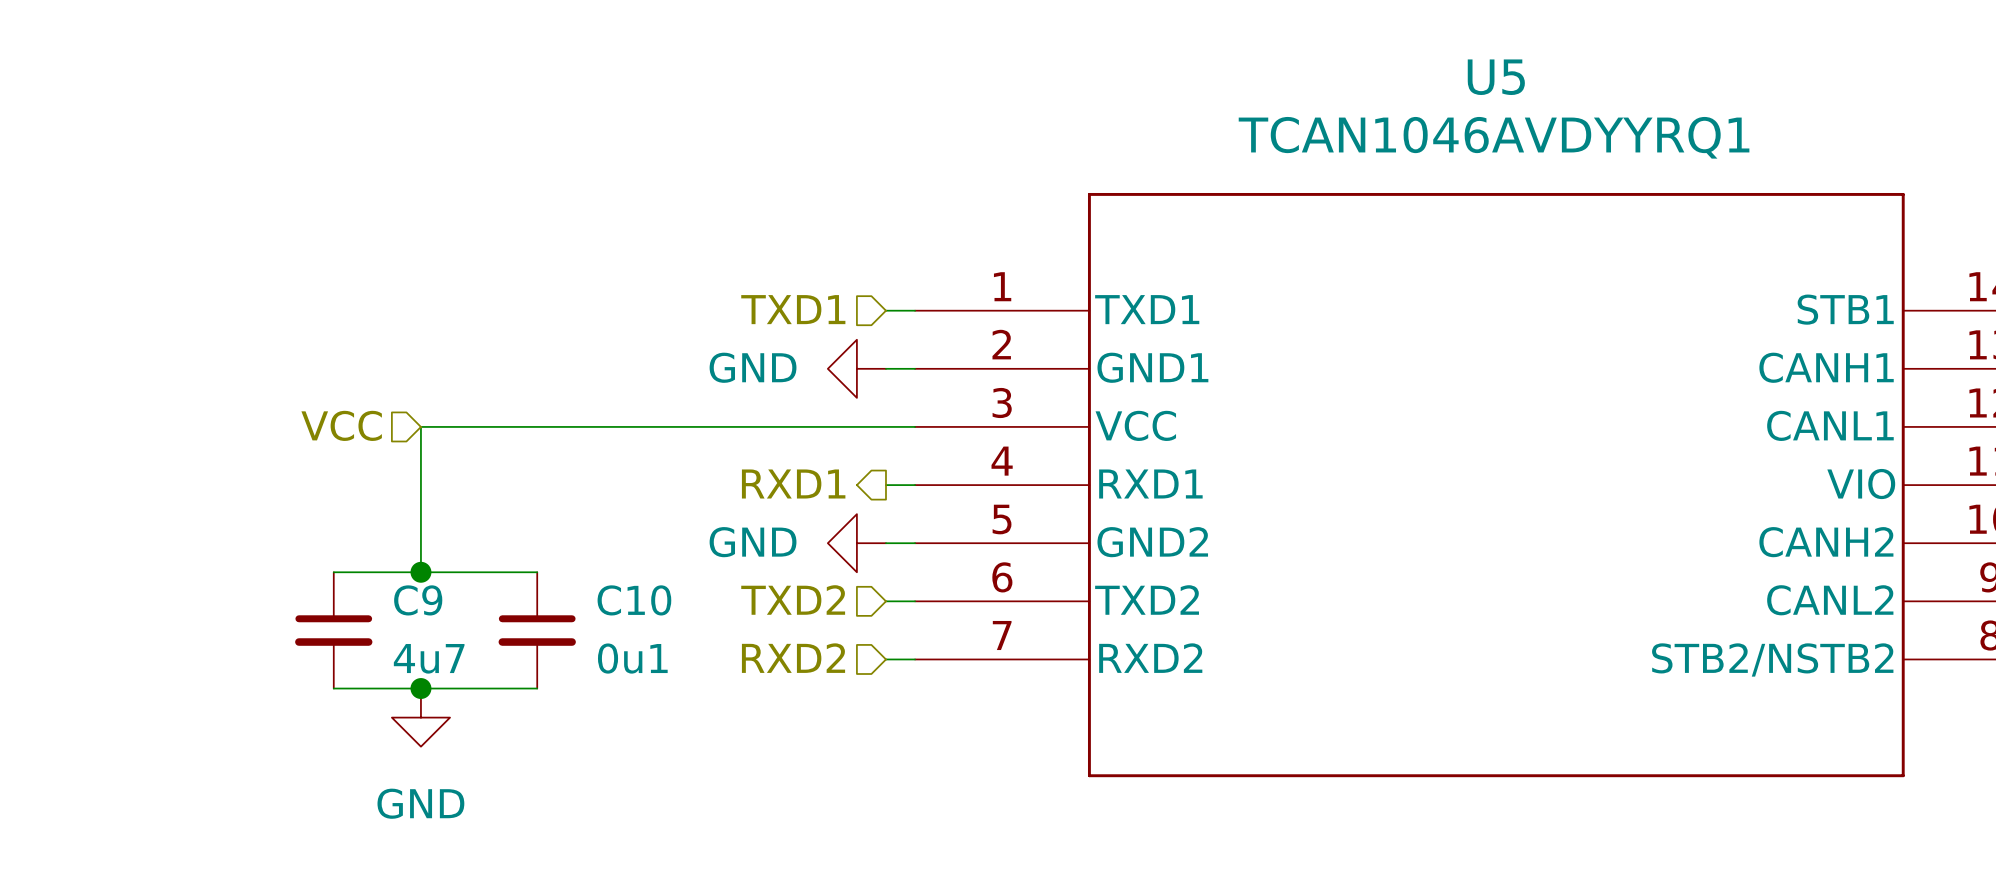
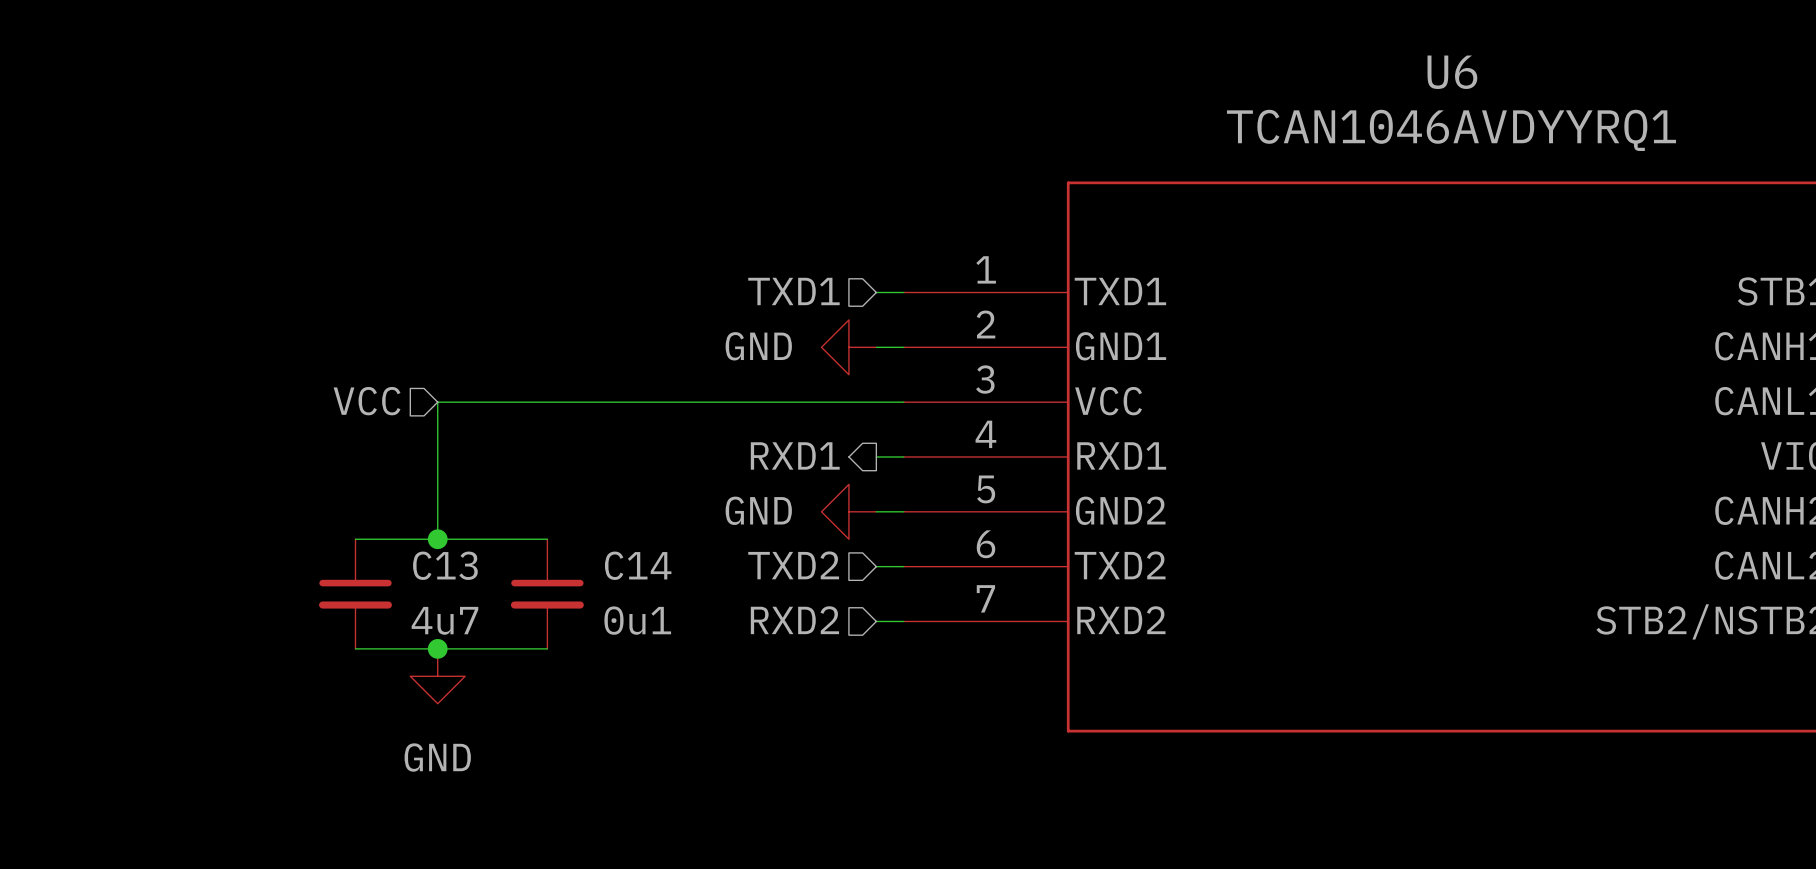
U5 name: U5 (1496, 77) -> U6 (1452, 72)
C9 name: C9 (418, 600) -> C13 (445, 565)
C10 name: C10 (634, 600) -> C14 (638, 565)

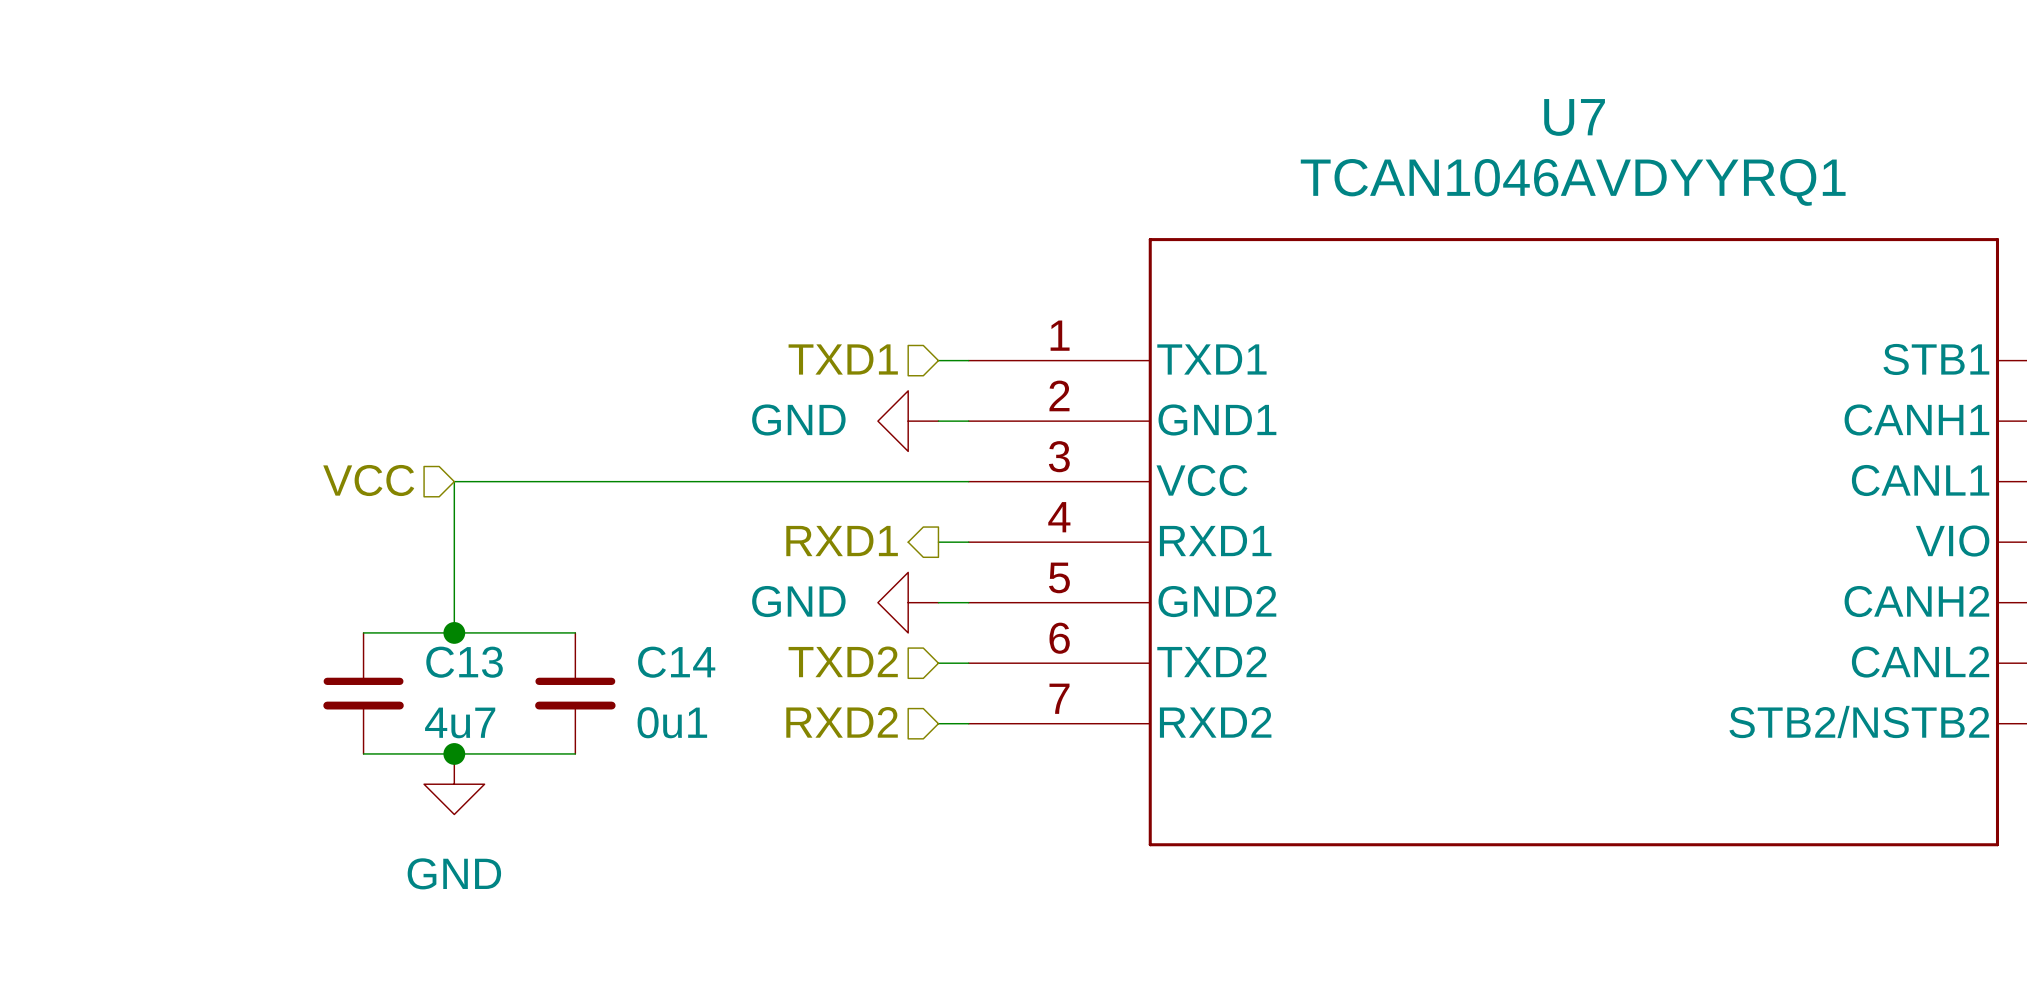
U6 name: U6 (1452, 72) -> U7 (1574, 117)

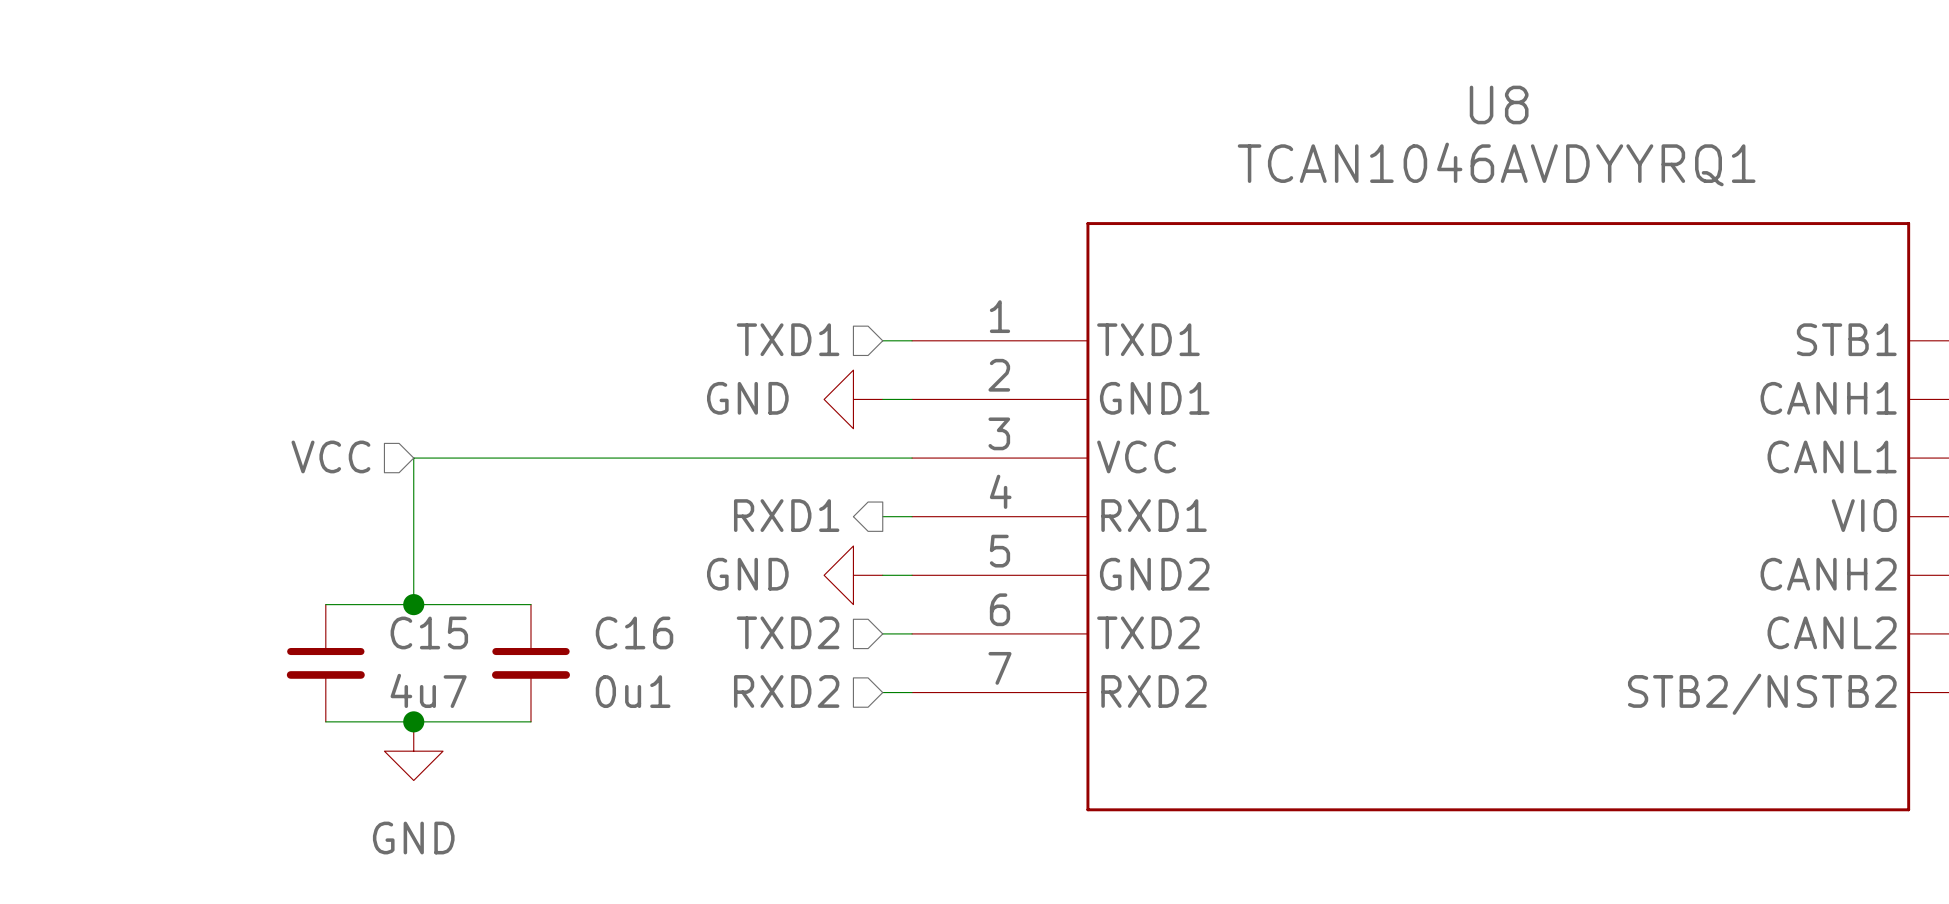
U7 name: U7 (1574, 117) -> U8 (1499, 104)
C13 name: C13 (464, 662) -> C15 (429, 632)
C14 name: C14 (676, 662) -> C16 (634, 632)

